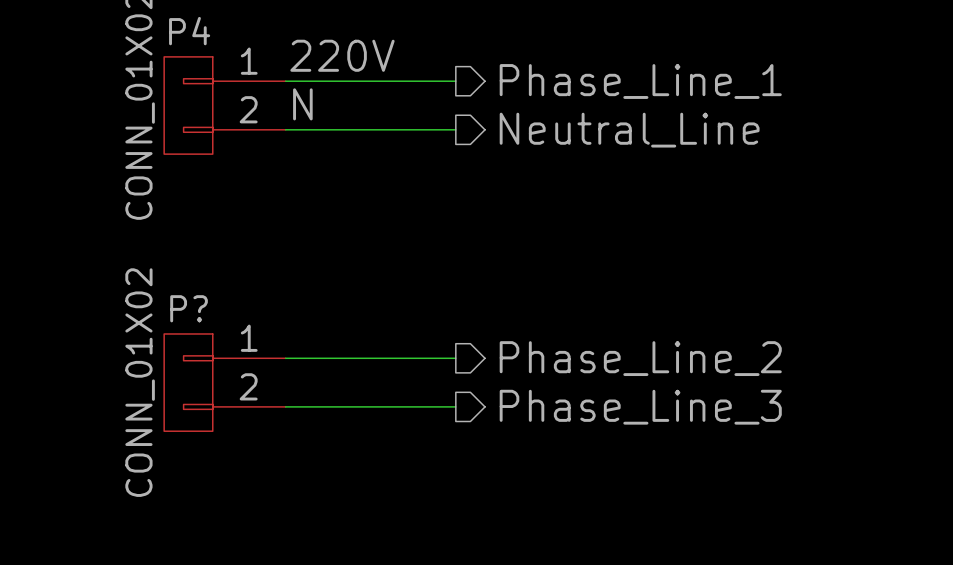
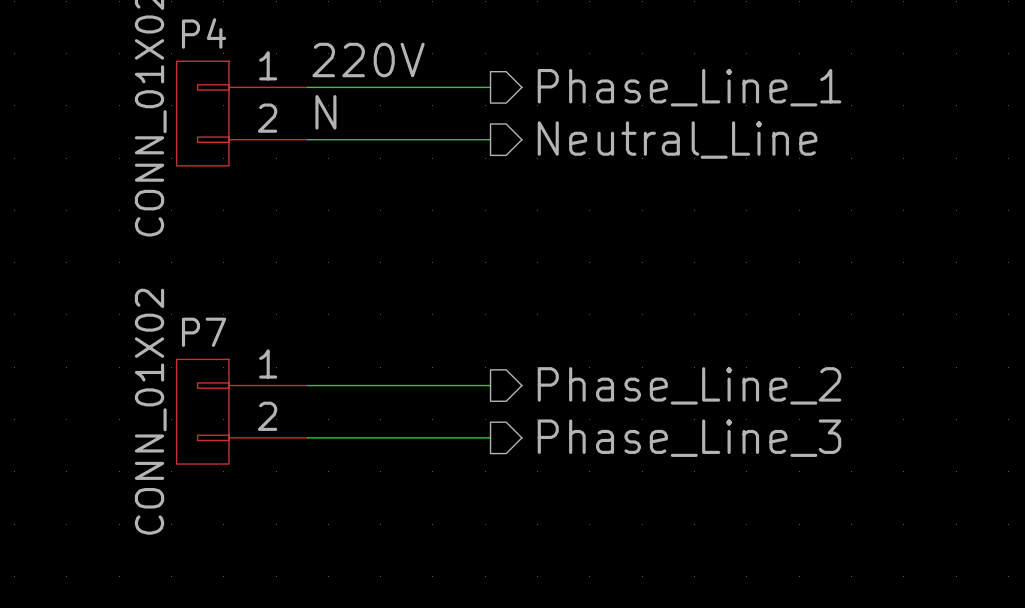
P? name: P? (189, 308) -> P7 (204, 332)

